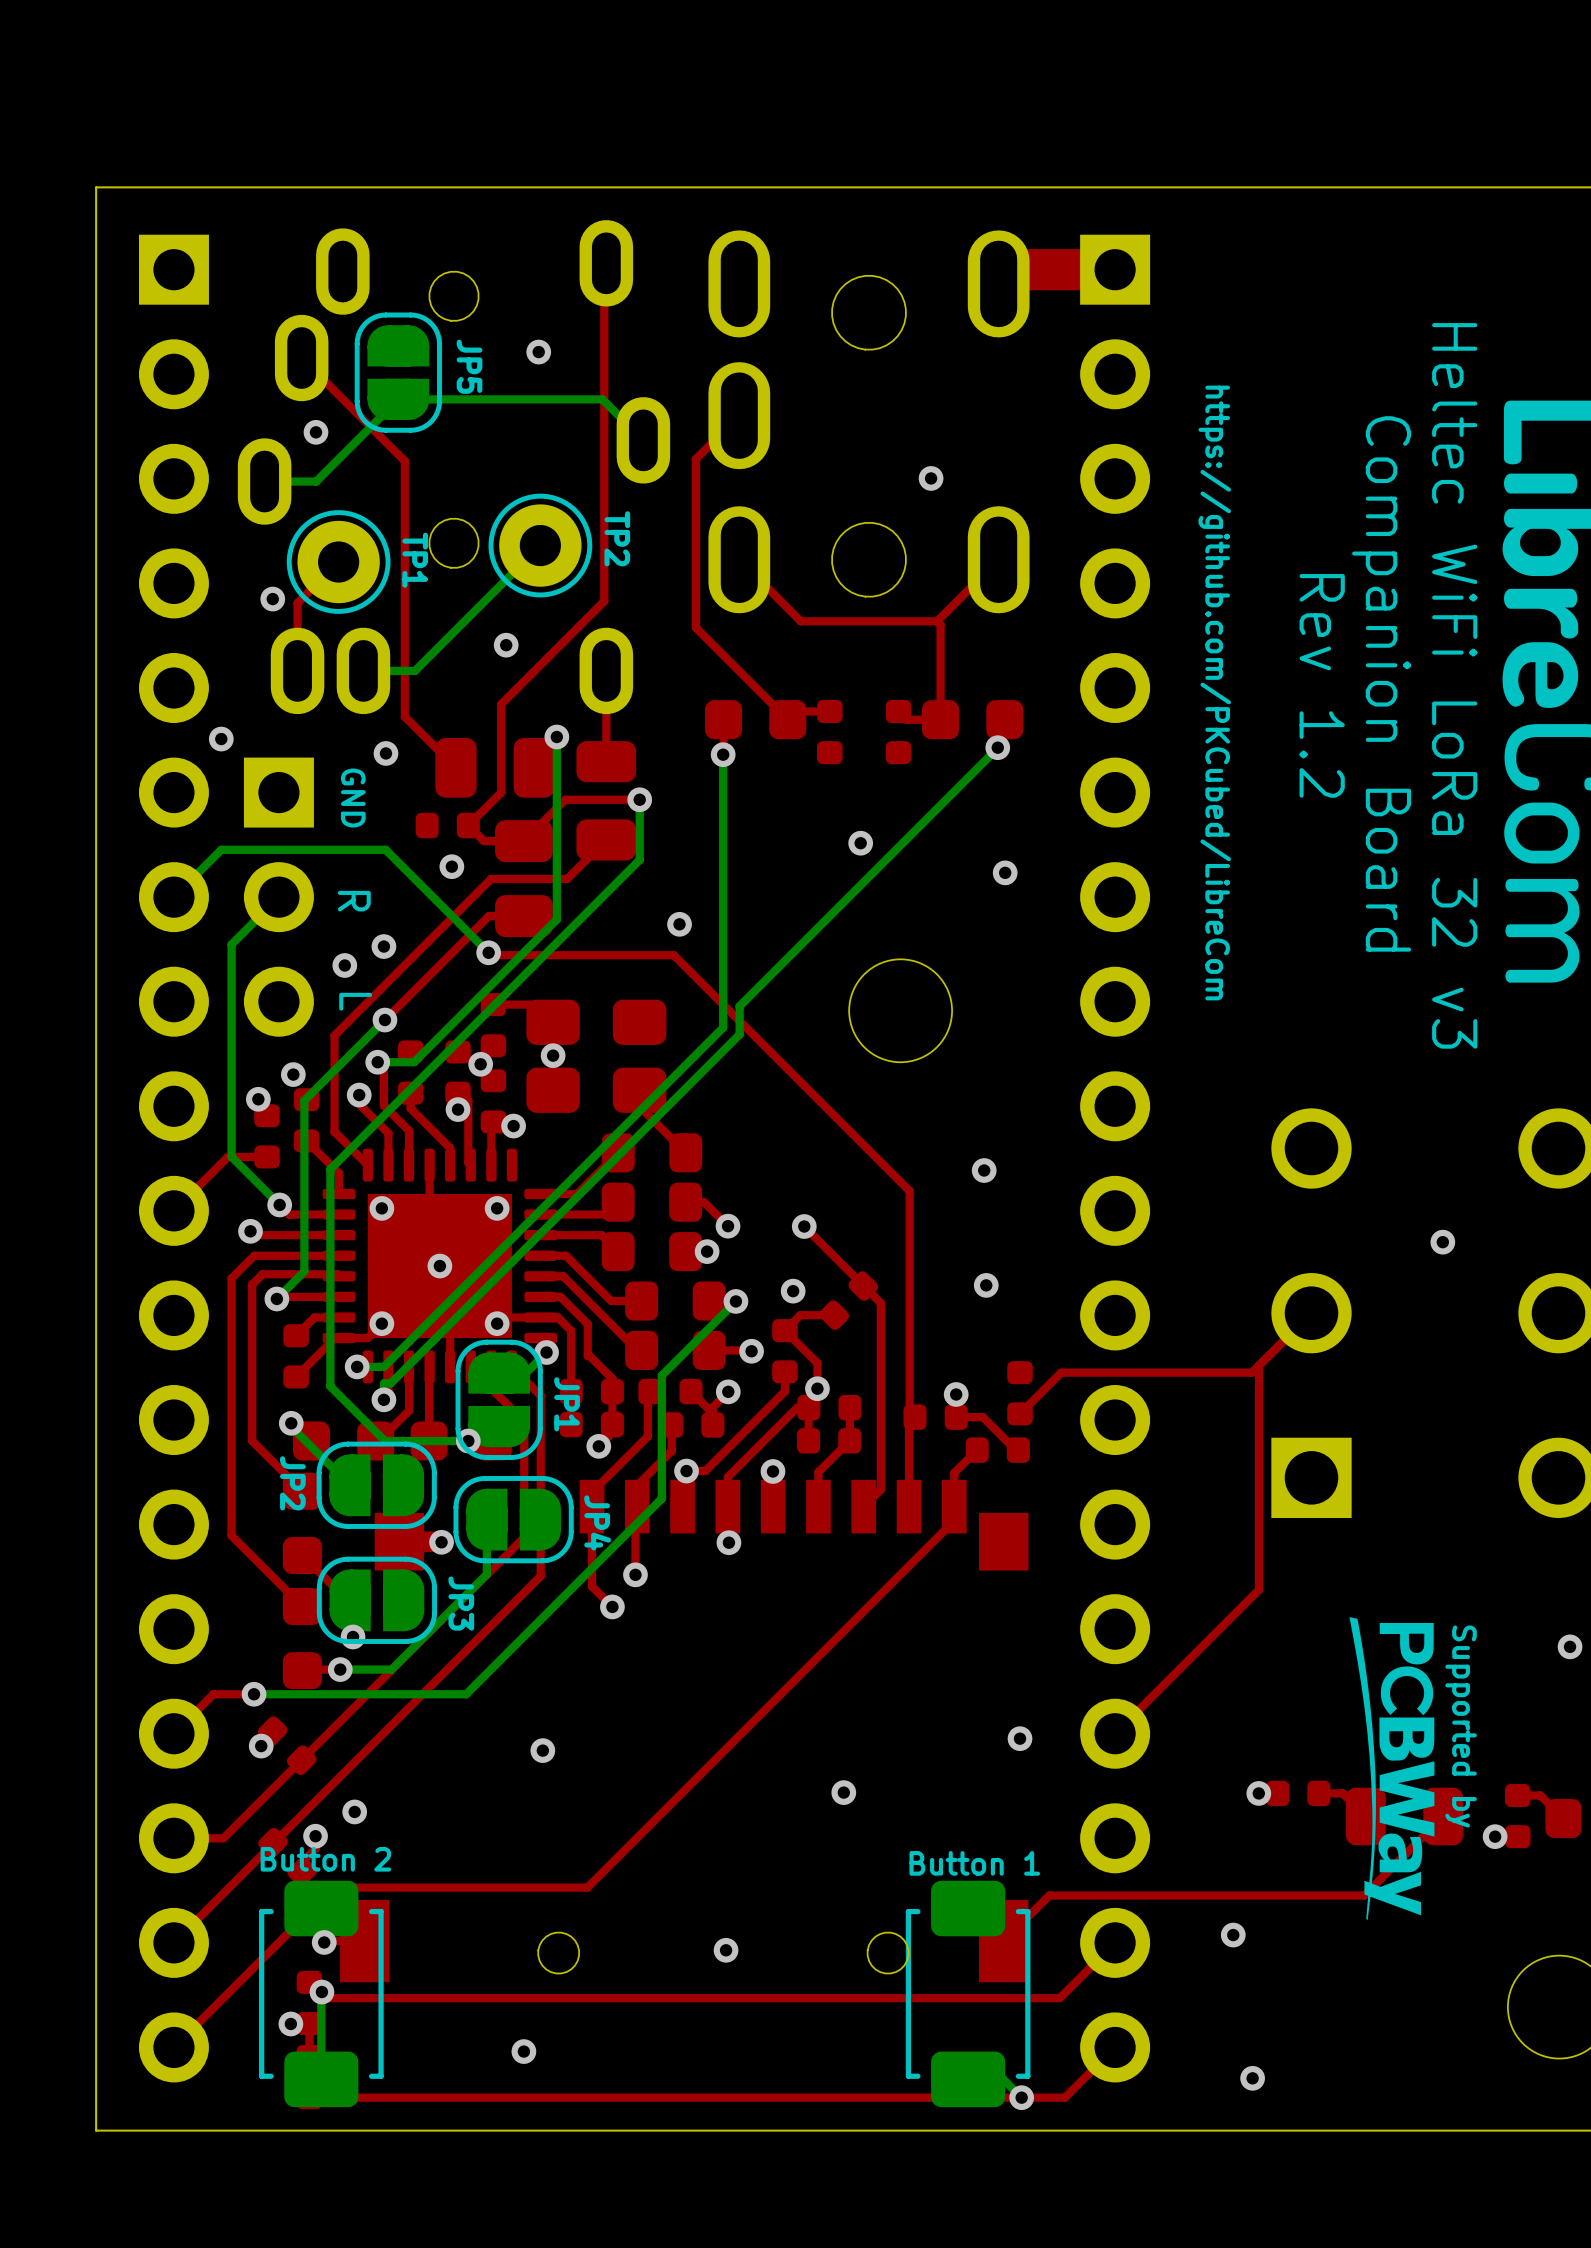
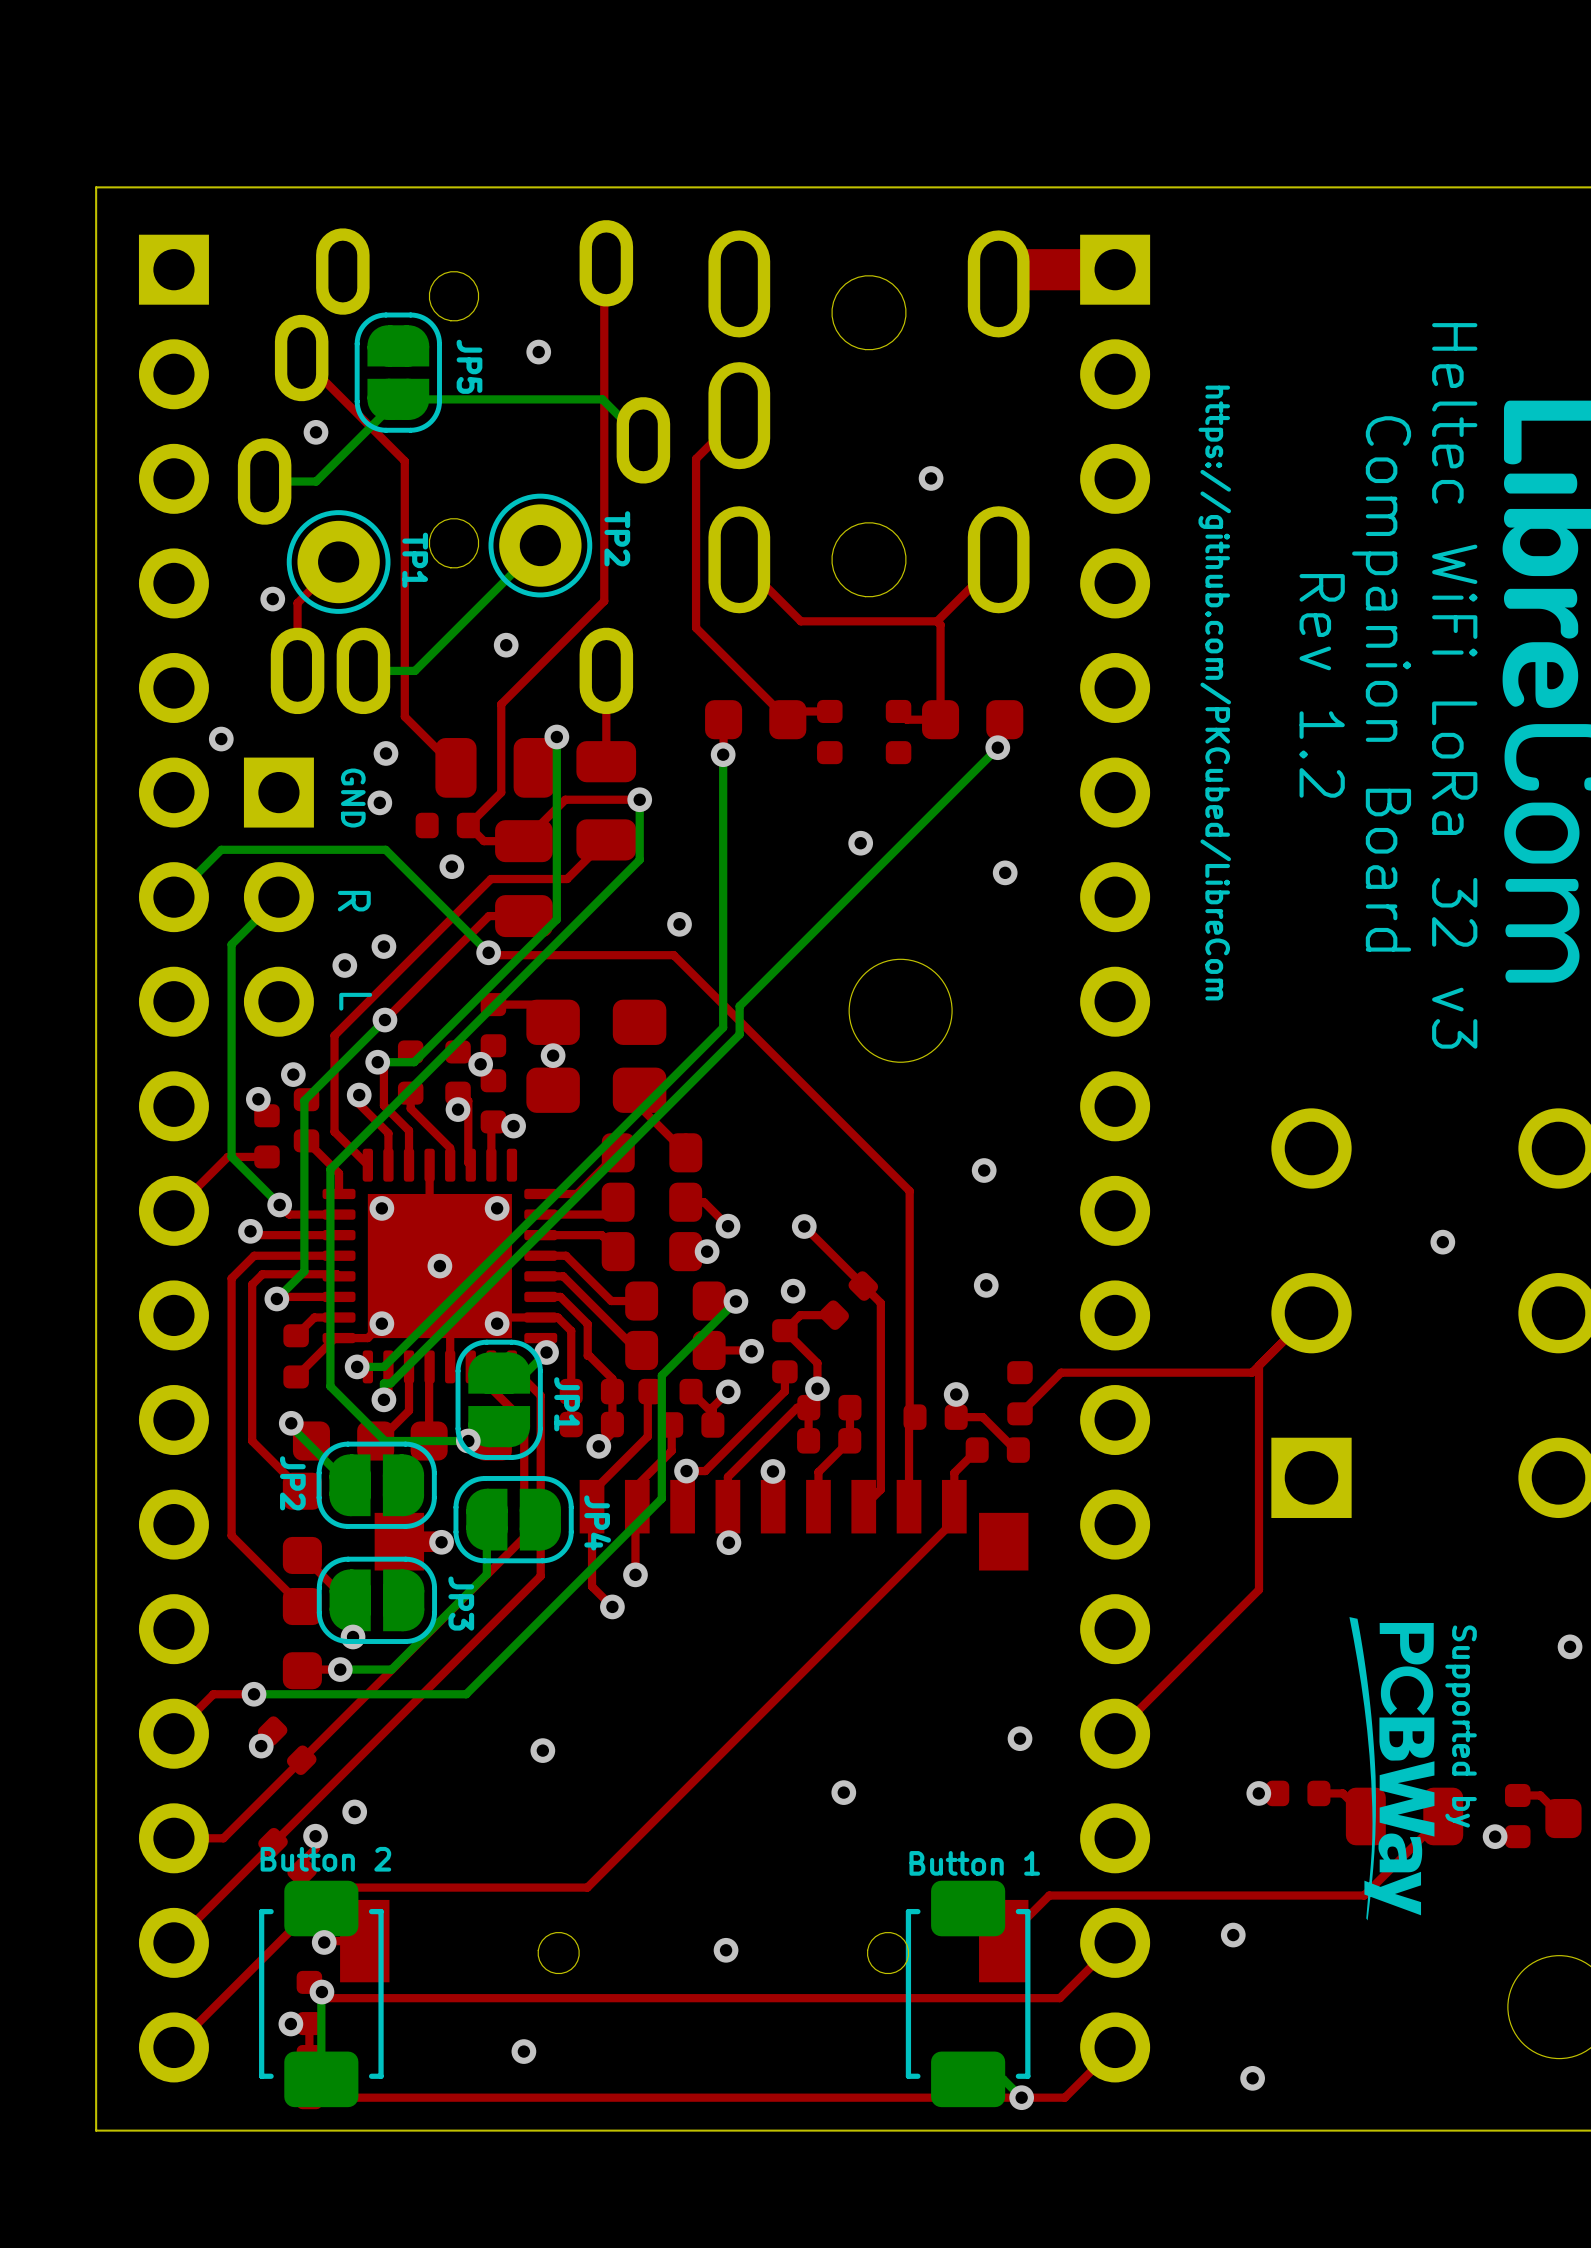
via: none -> (379, 802)

